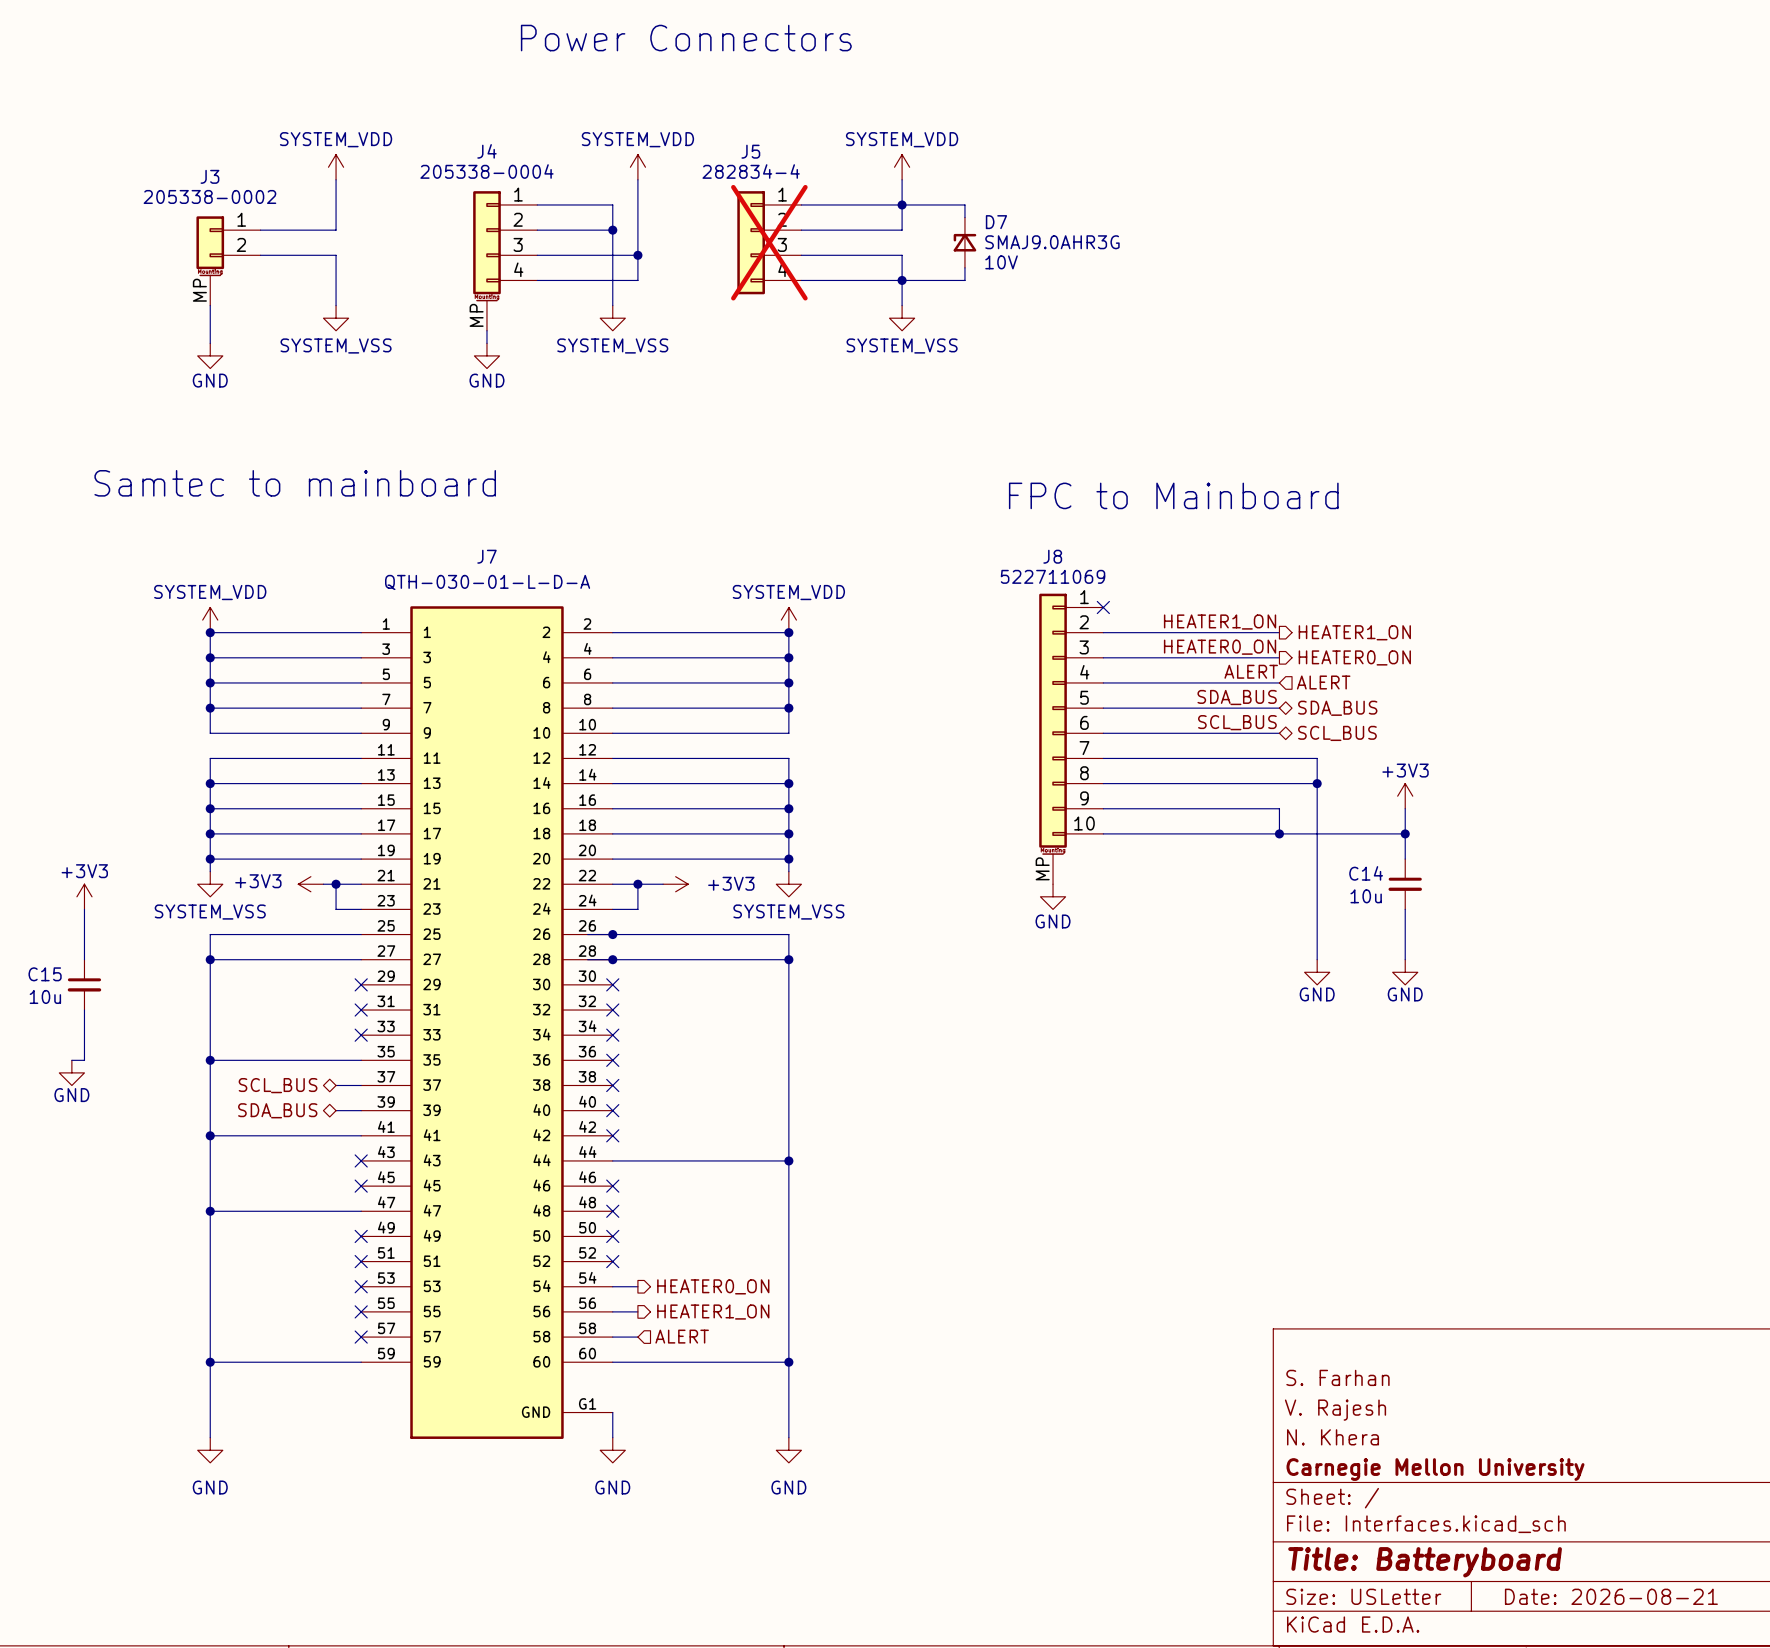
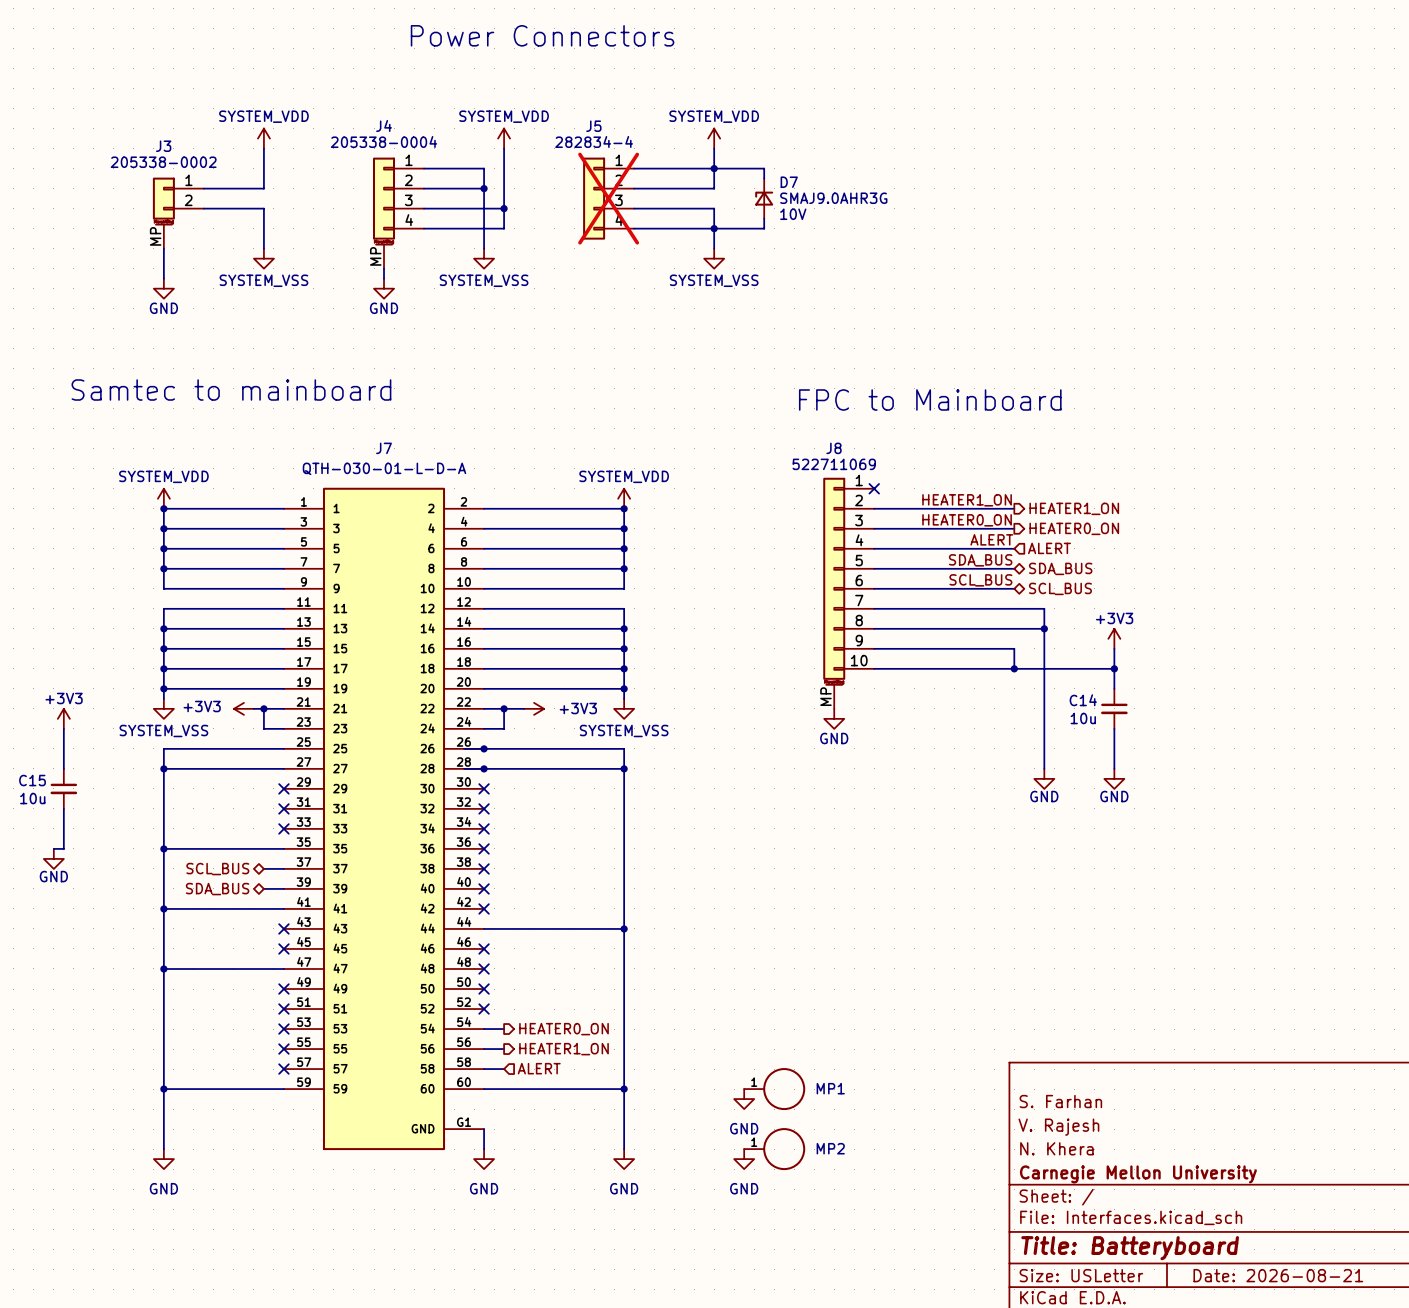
MP1: none -> (774, 1089)
power symbol: none -> GND (744, 1099)
MP2: none -> (774, 1149)
power symbol: none -> GND (744, 1159)

